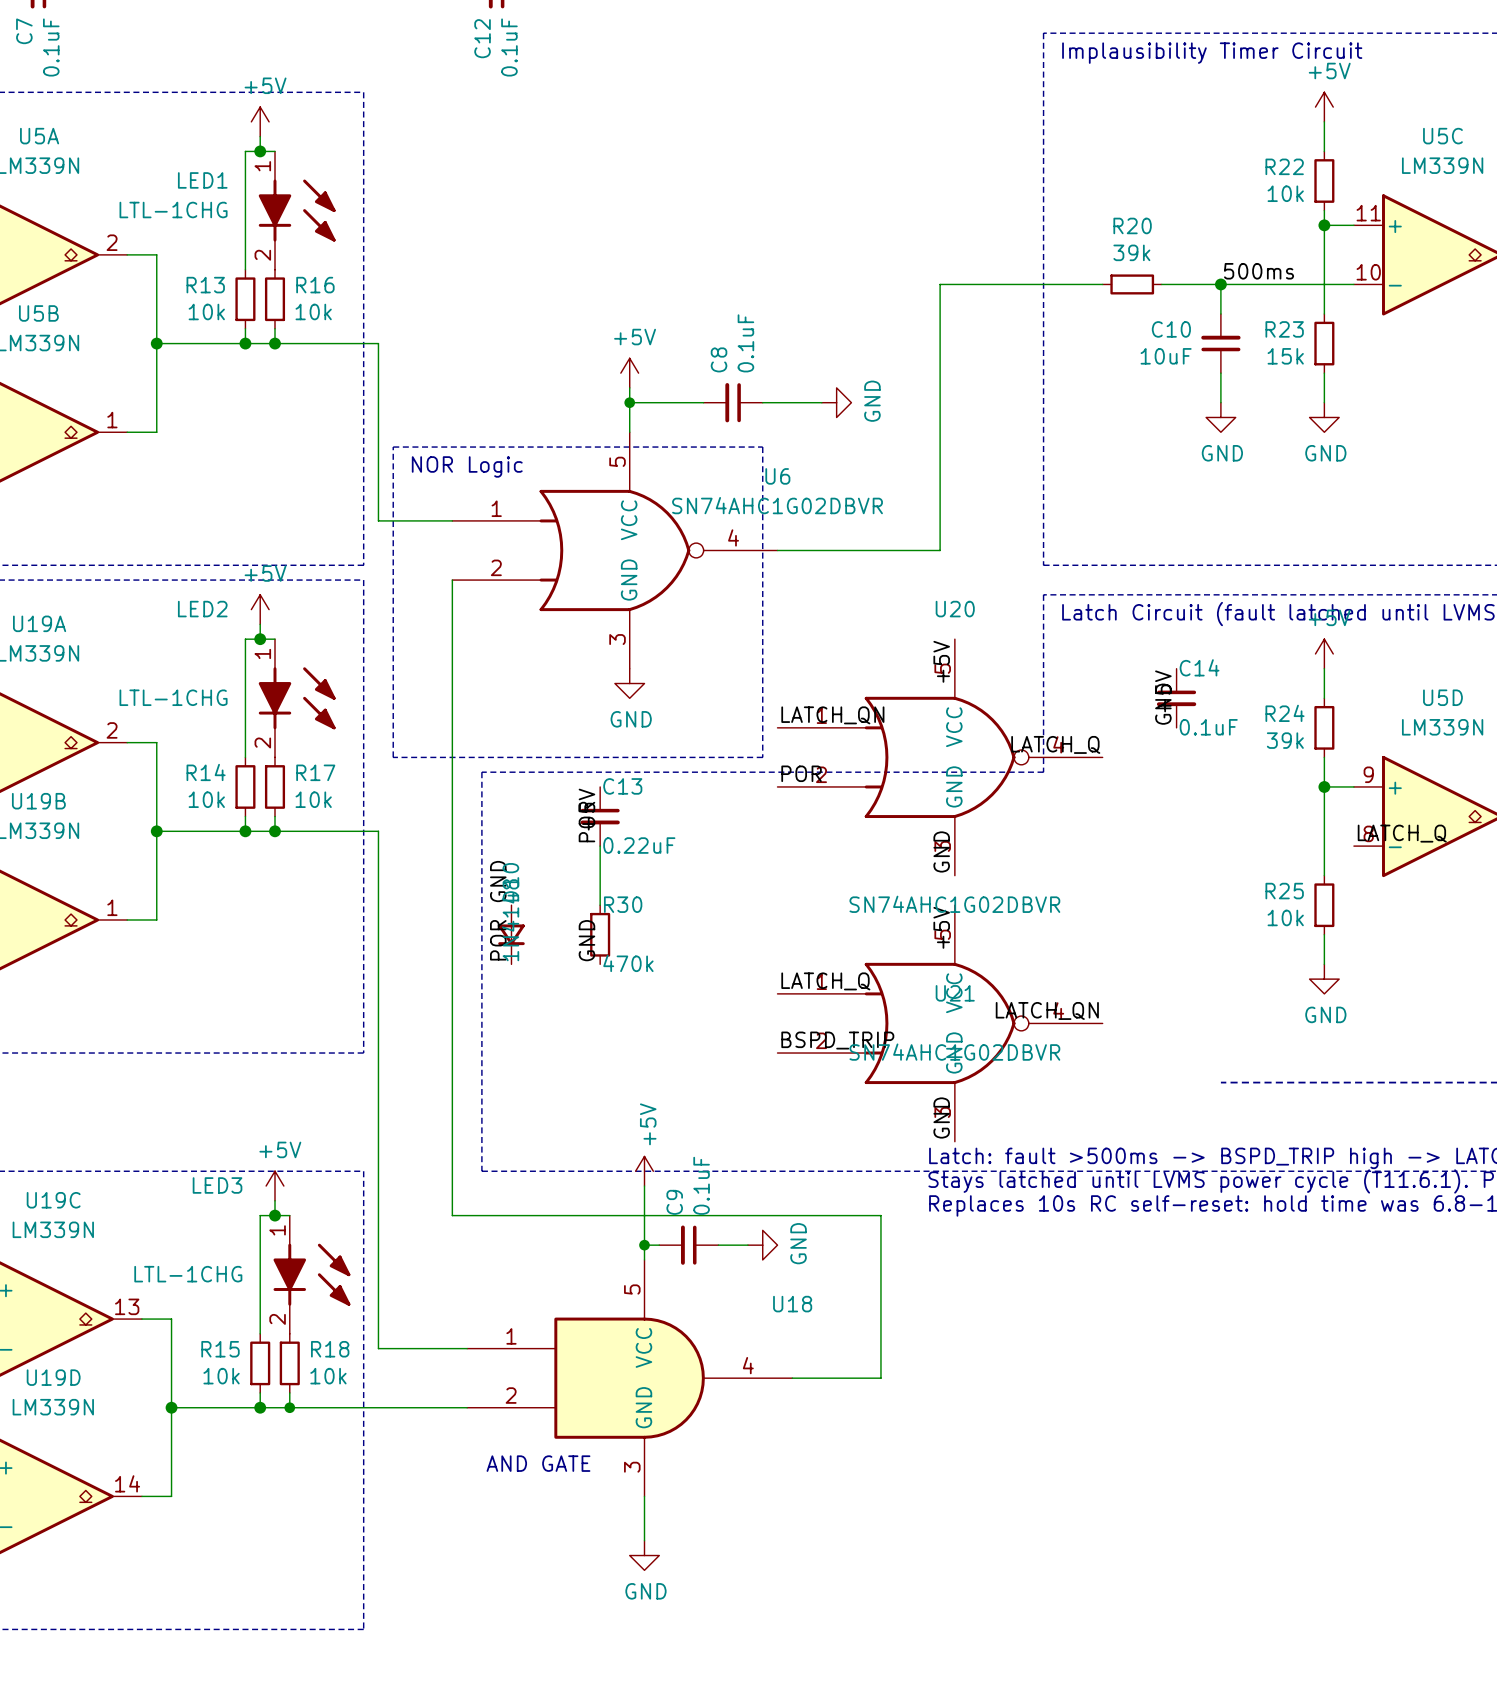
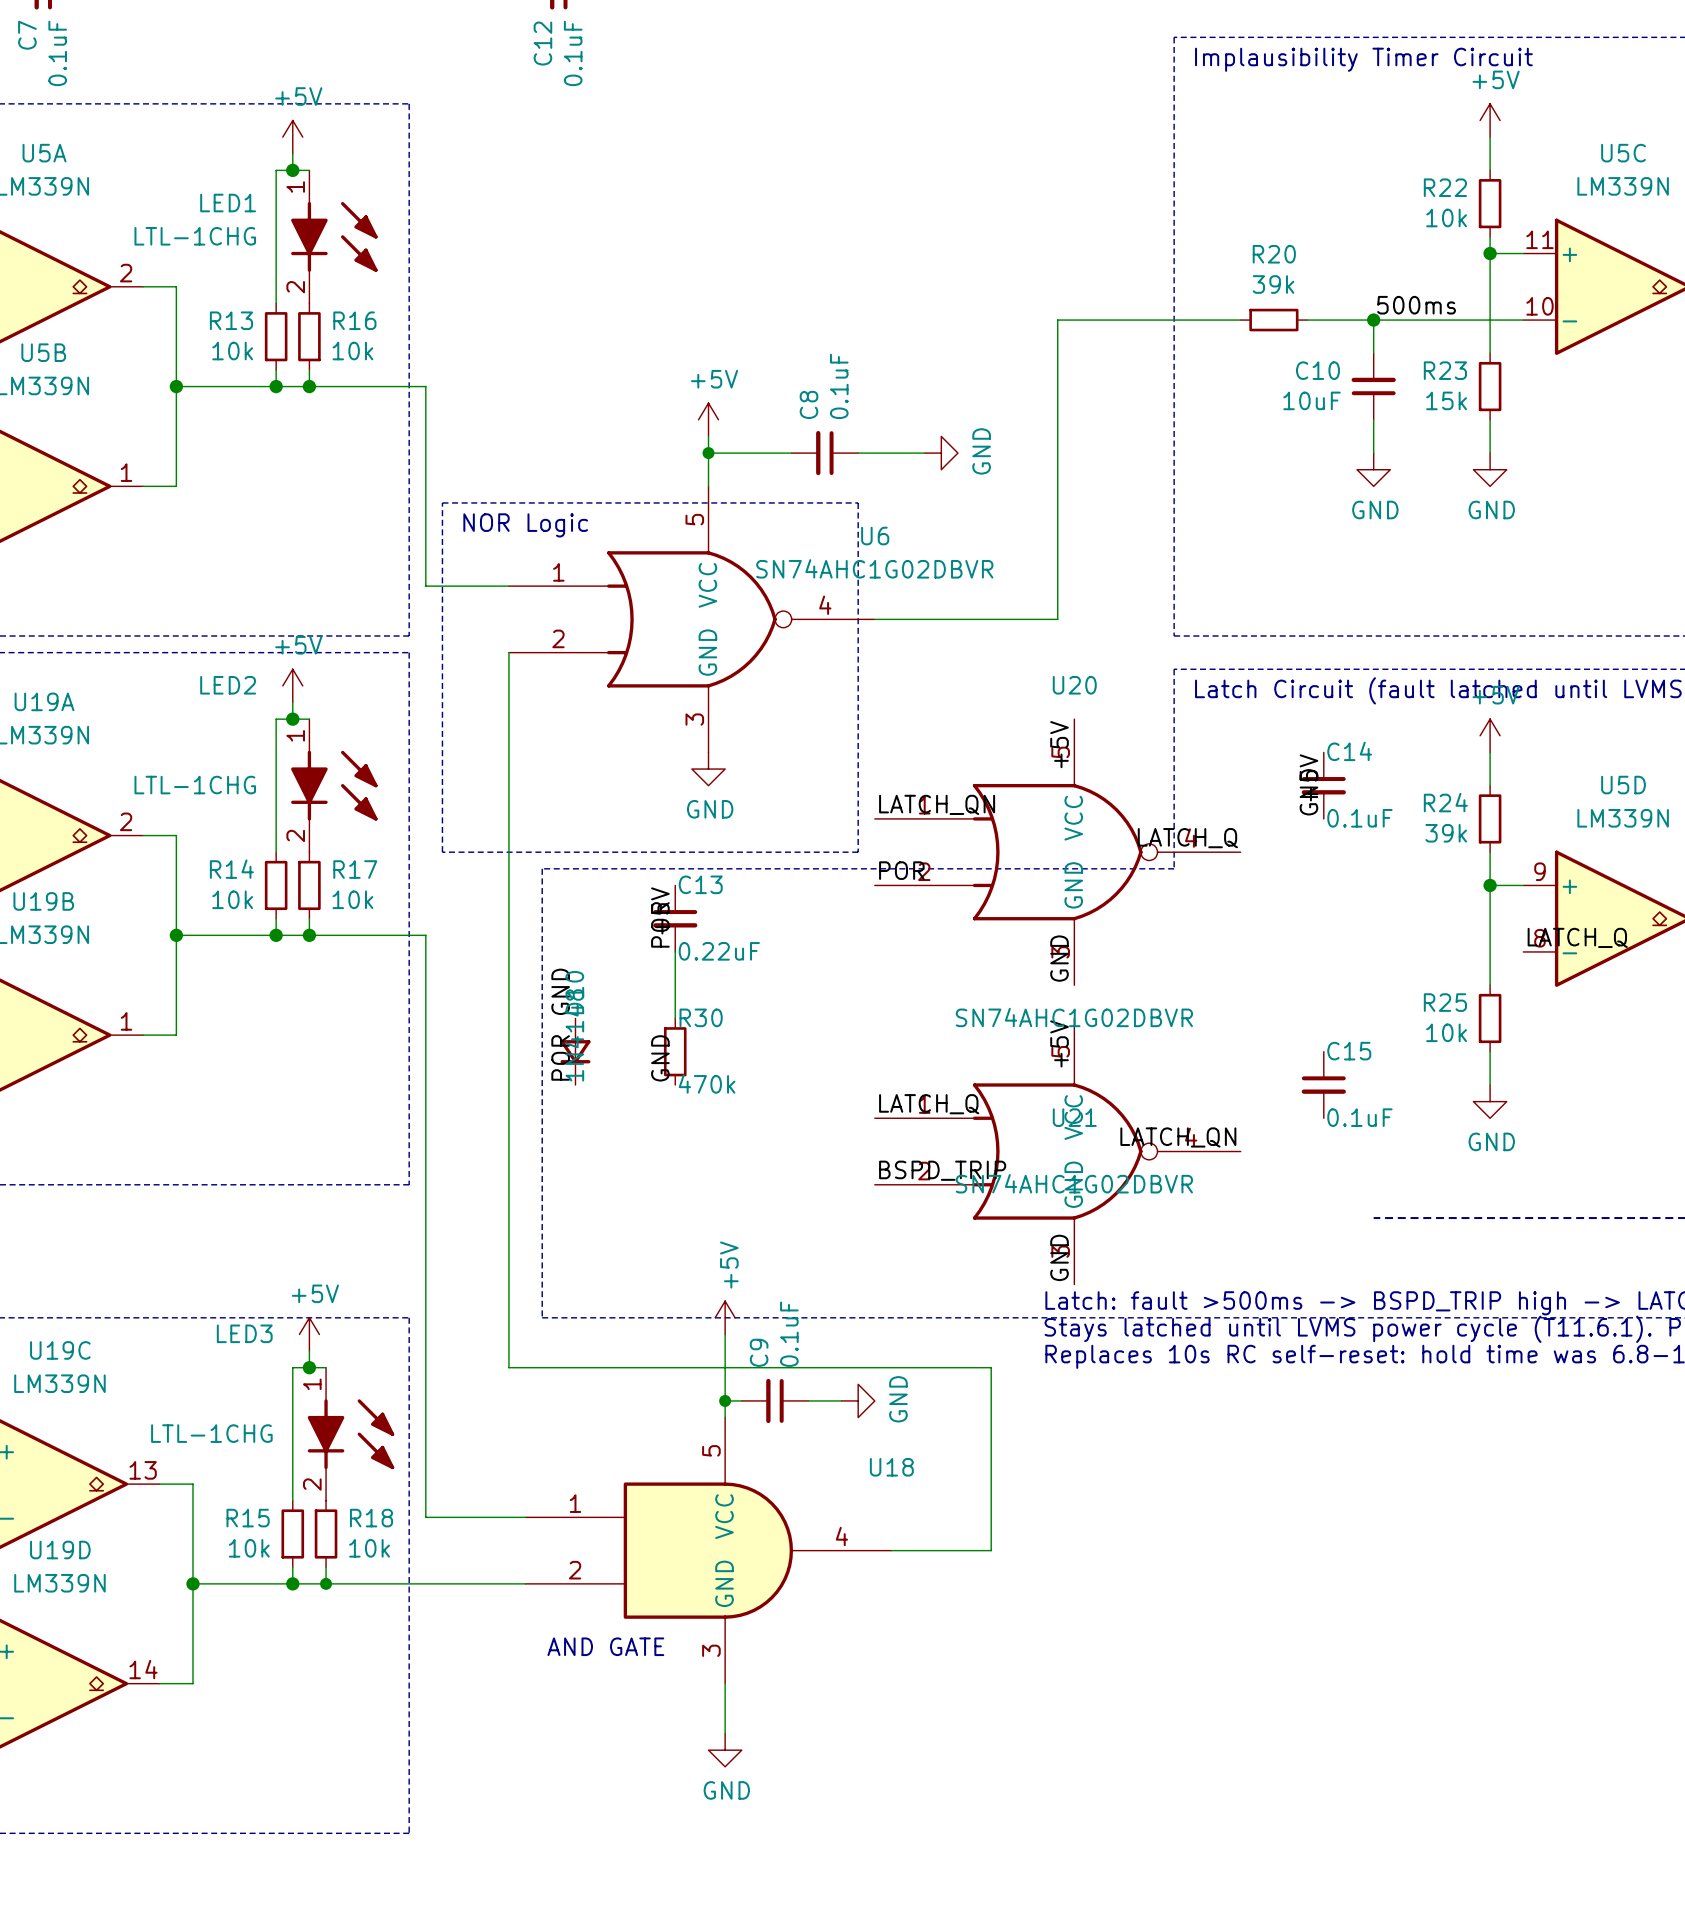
C15: none -> 0.1uF (1323, 1085)

